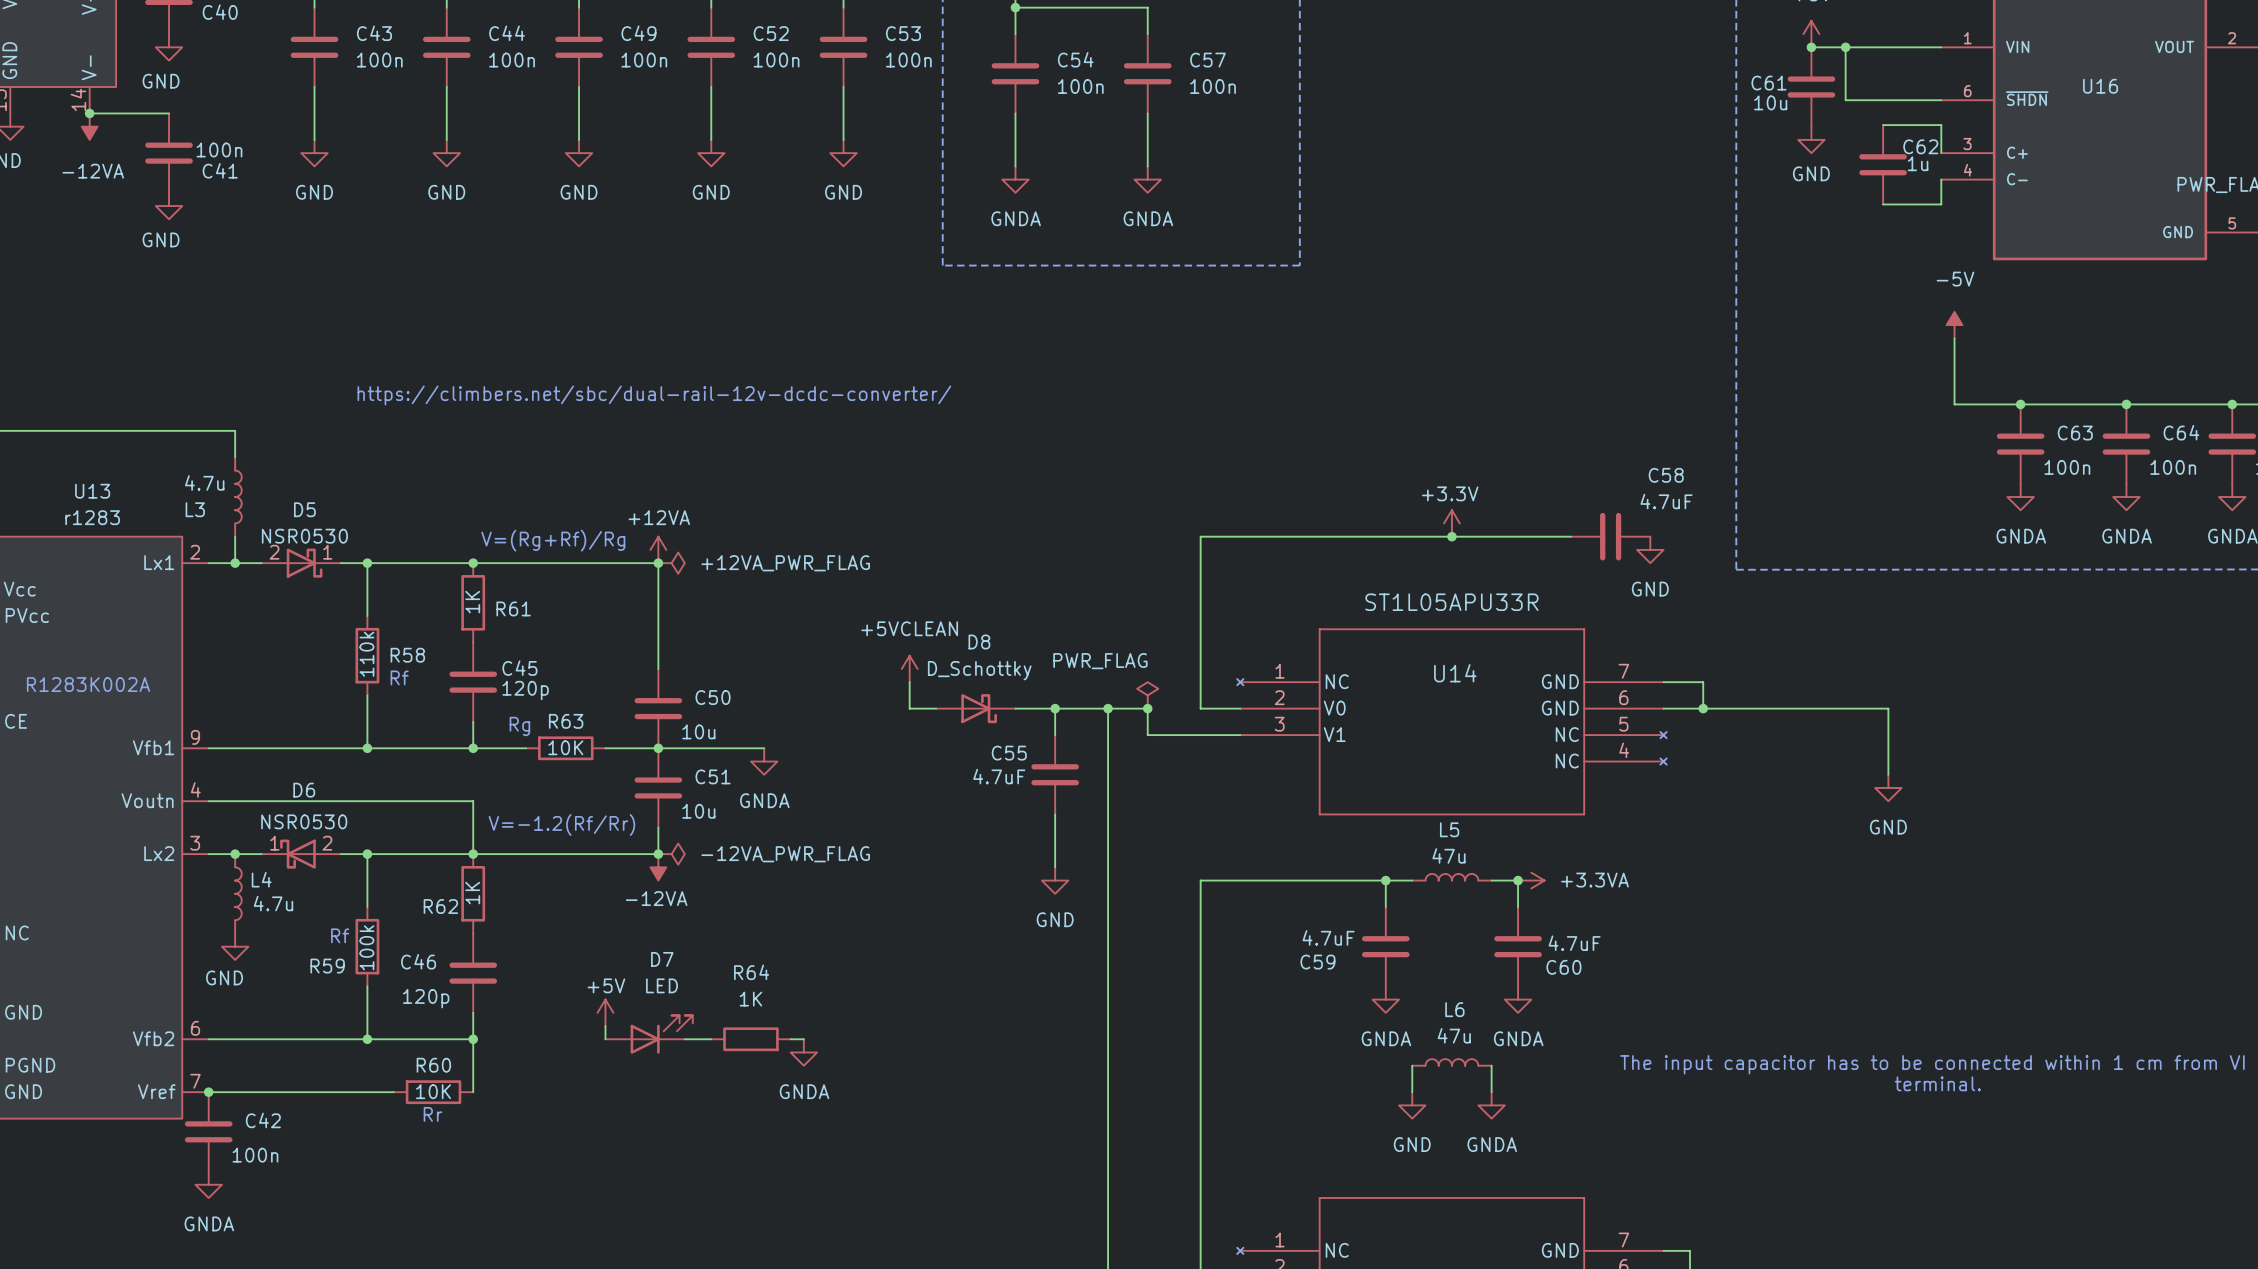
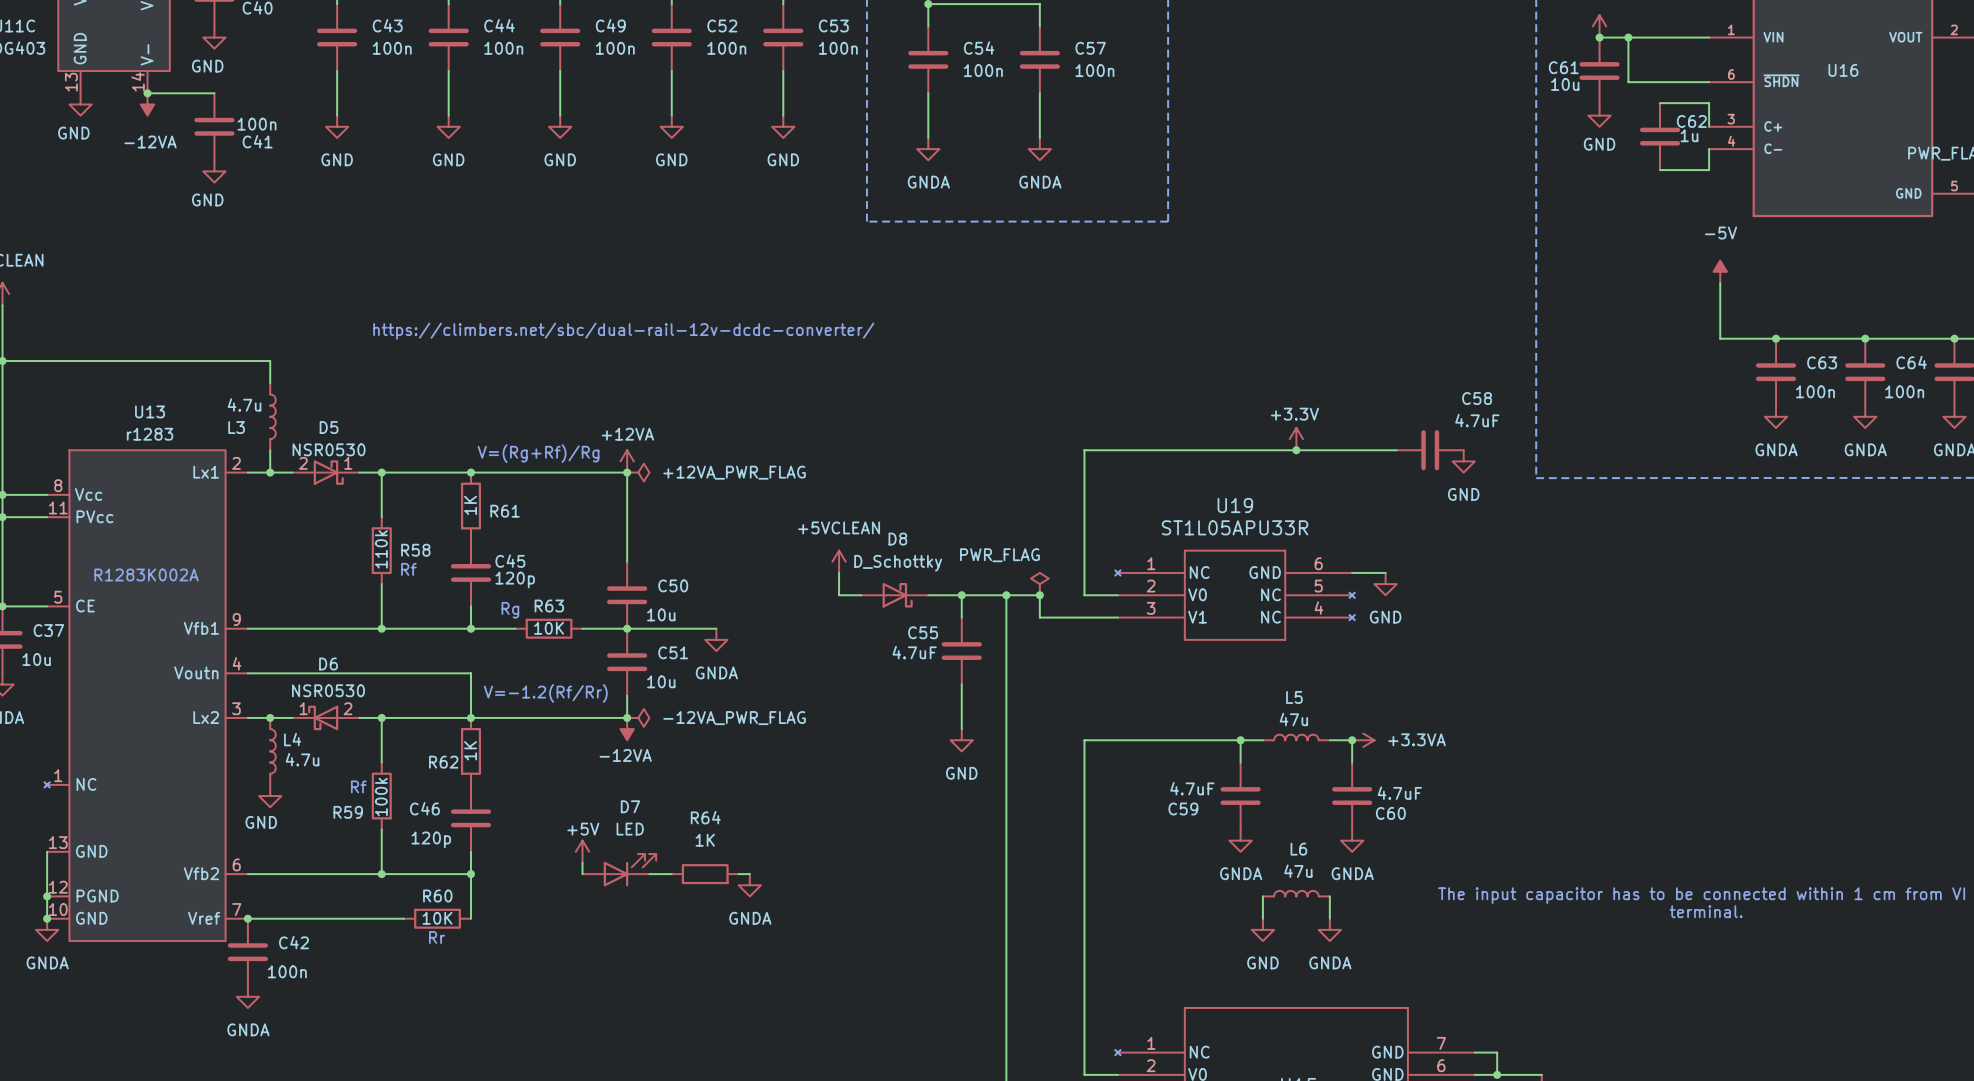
wire: none -> (1352, 572) (1385, 572)
wire: (1663, 682) (1703, 682) (1703, 708) -> none
power symbol: none -> GND (1385, 584)
U19: none -> ST1L05APU33R (1235, 595)
wire: (1663, 708) (1888, 708) (1888, 774) -> none
junction: (1703, 708) -> none
U14: ST1L05APU33R (1451, 721) -> none
power symbol: GND (1888, 787) -> none

